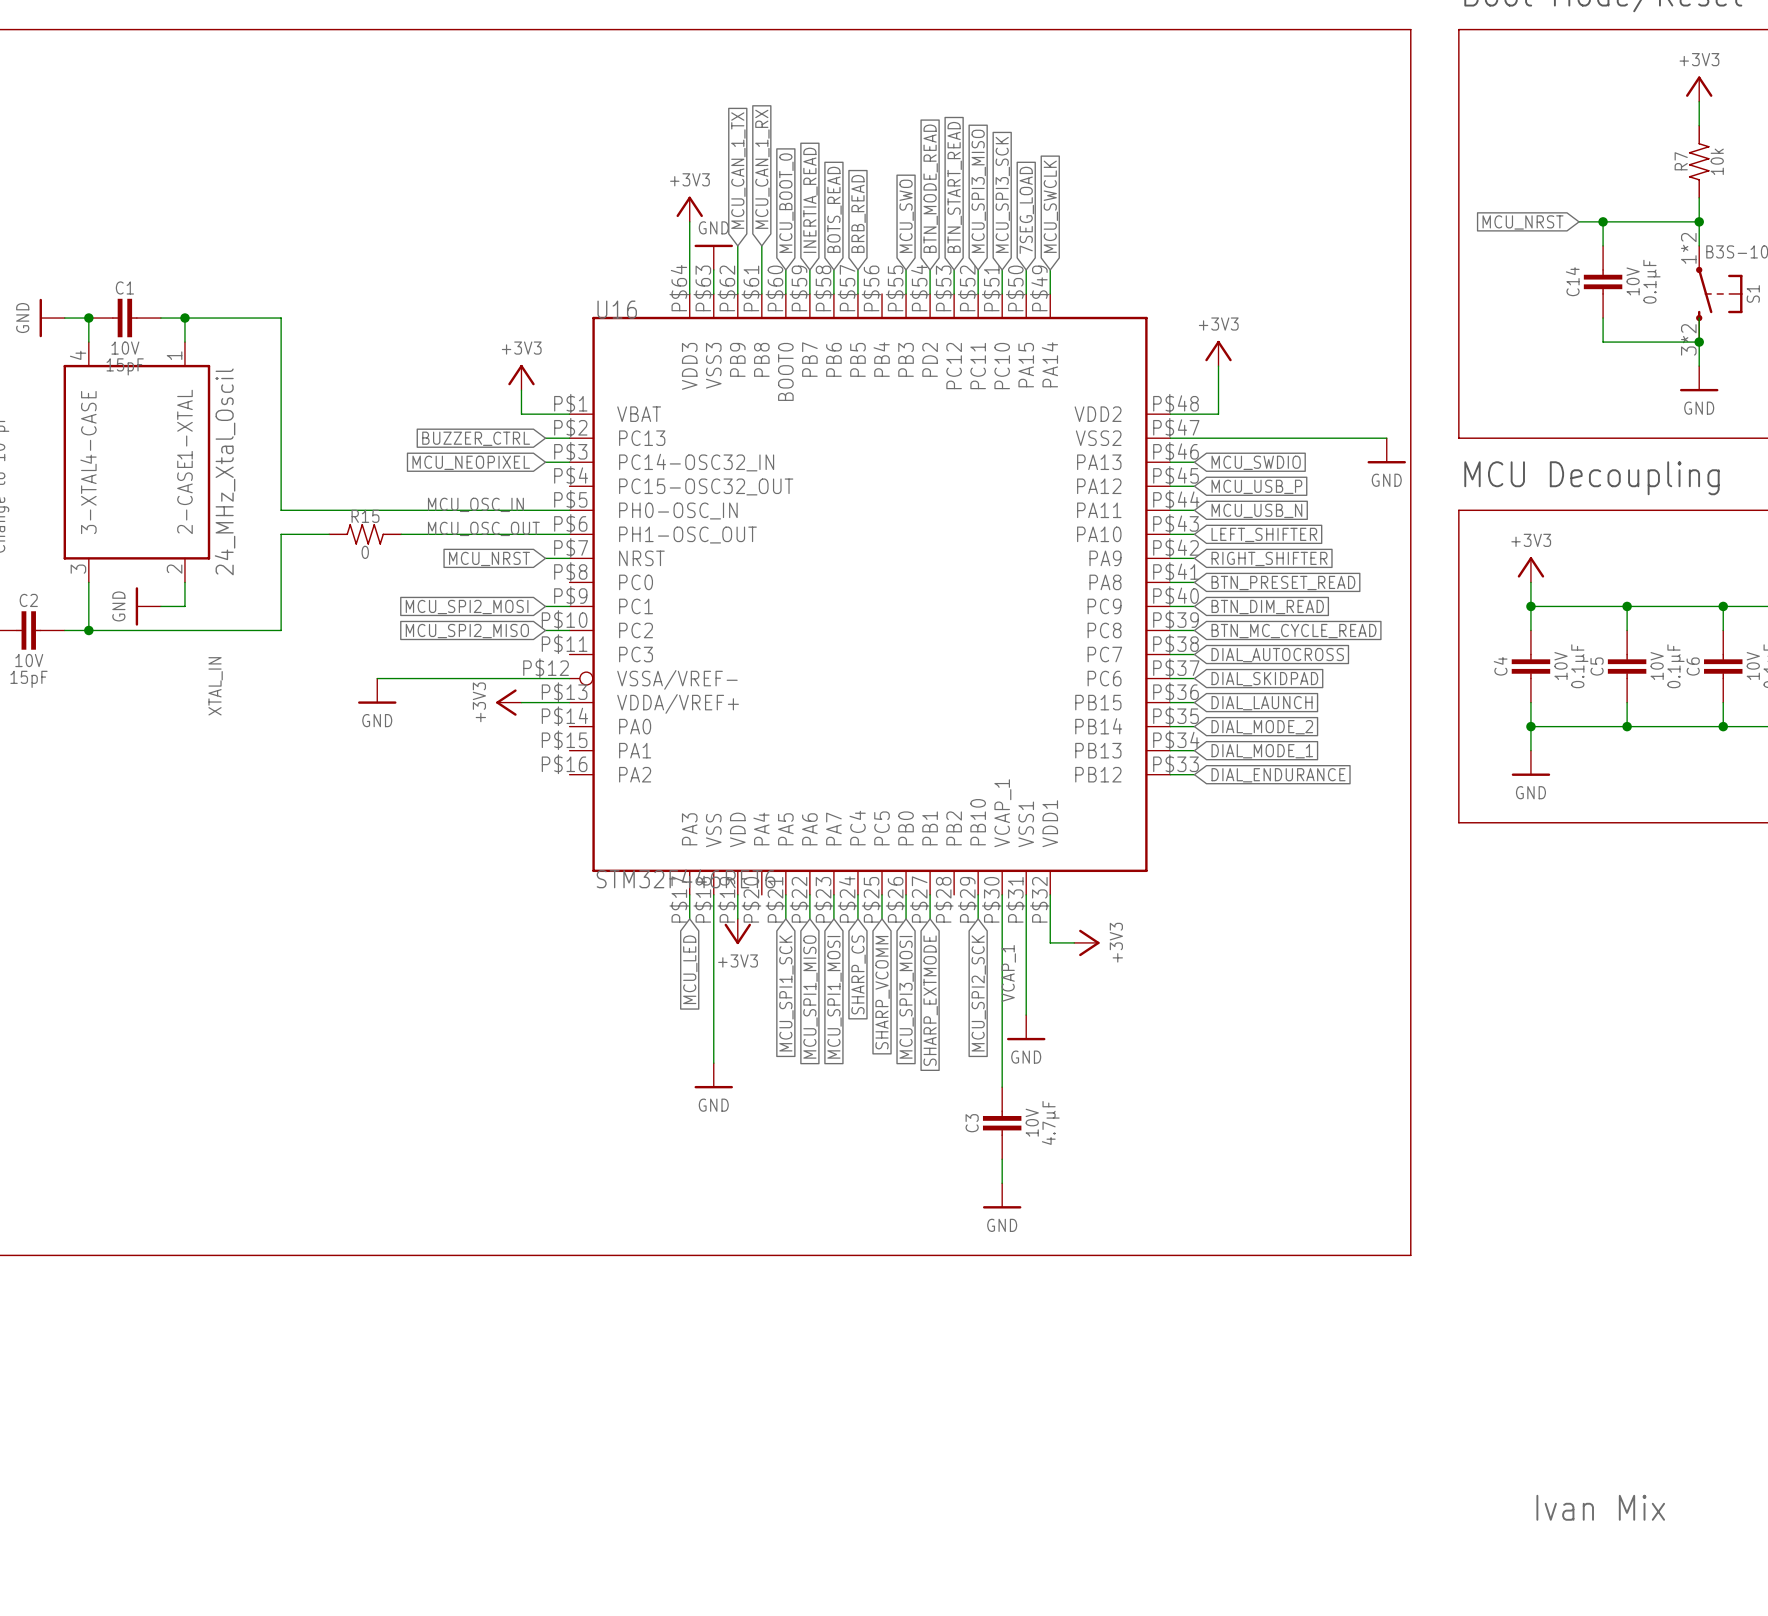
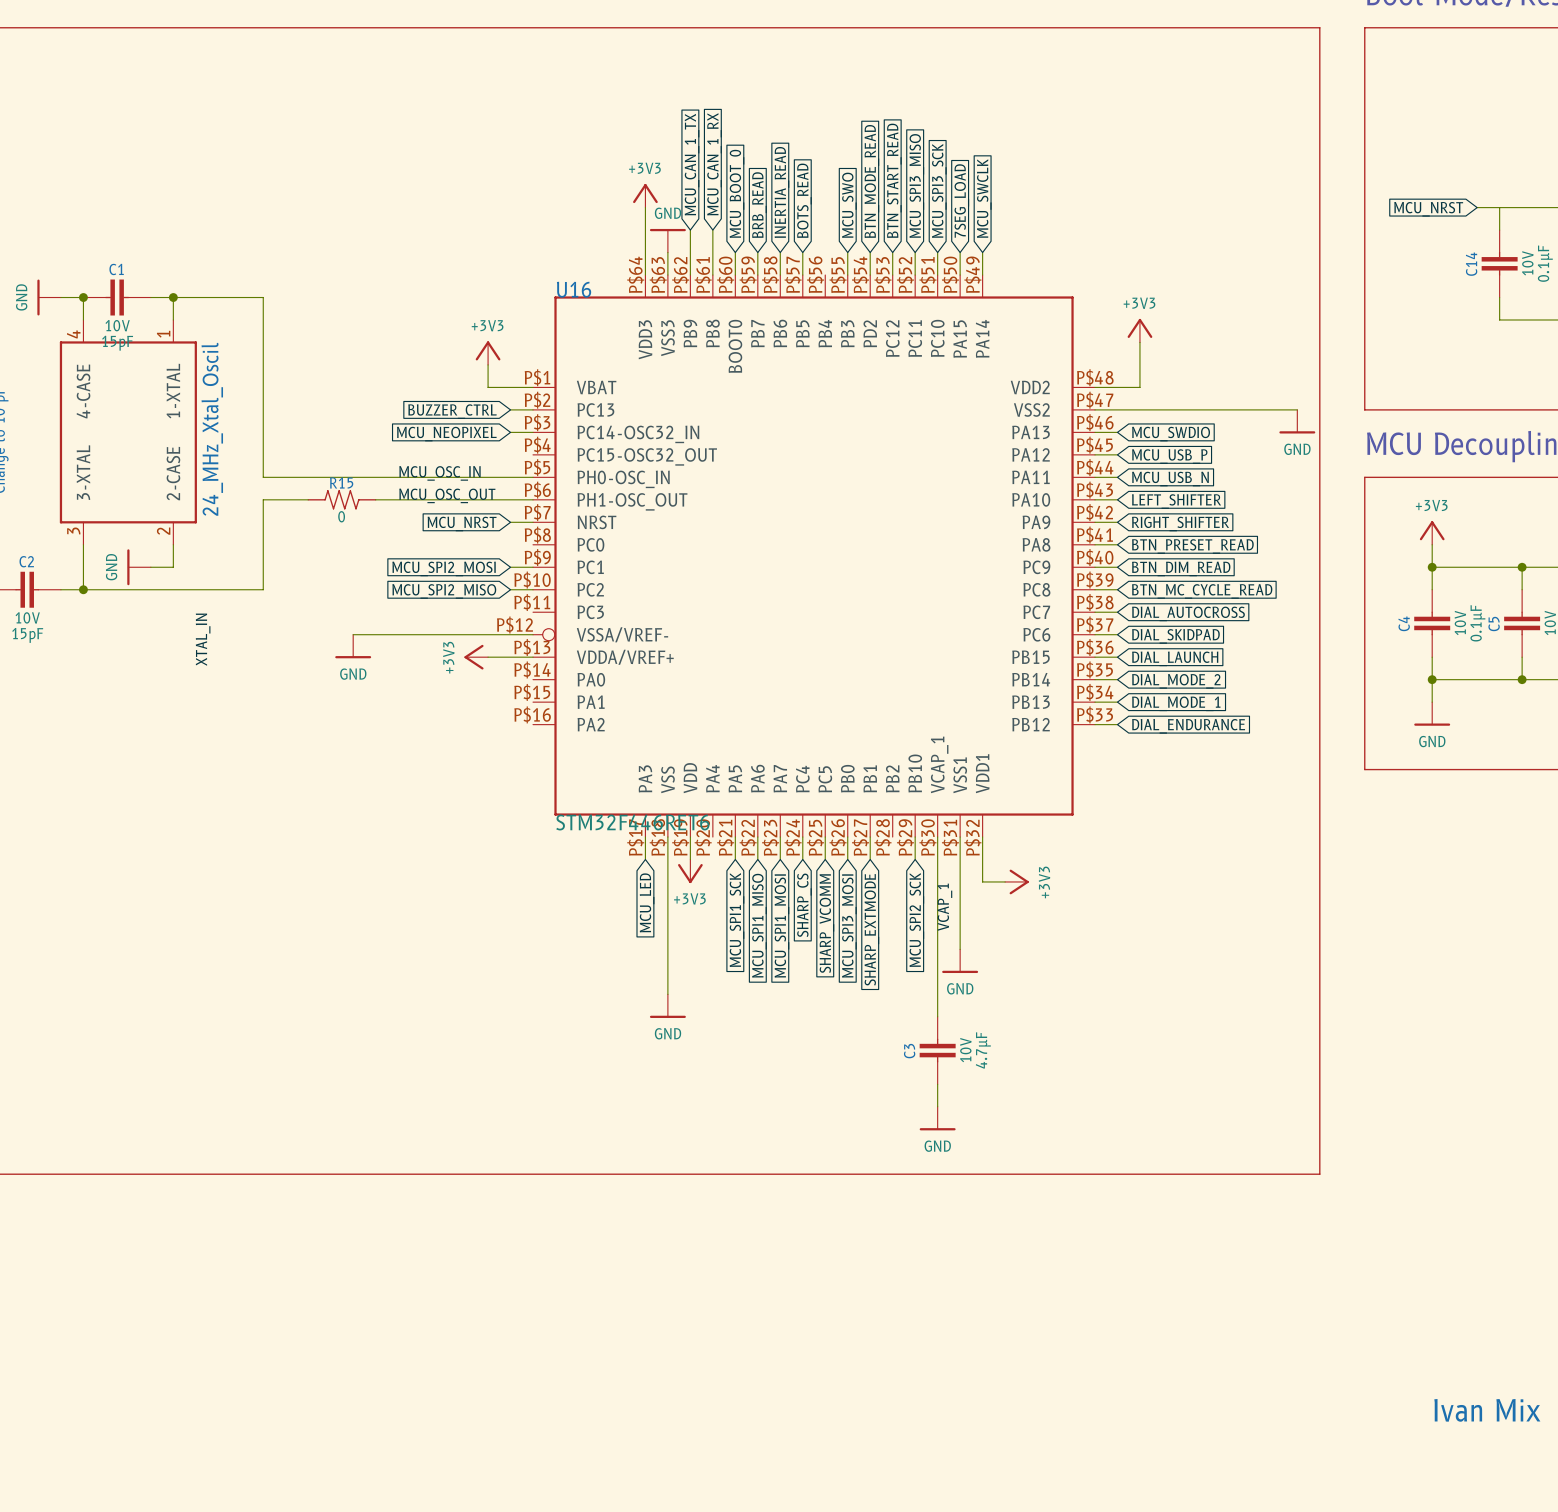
global label: INERTIA_READ (810, 200) -> BRB_READ (759, 205)
global label: BOTS_READ (834, 209) -> INERTIA_READ (781, 192)
global label: BRB_READ (858, 213) -> BOTS_READ (804, 200)
junction: (1603, 221) -> none

